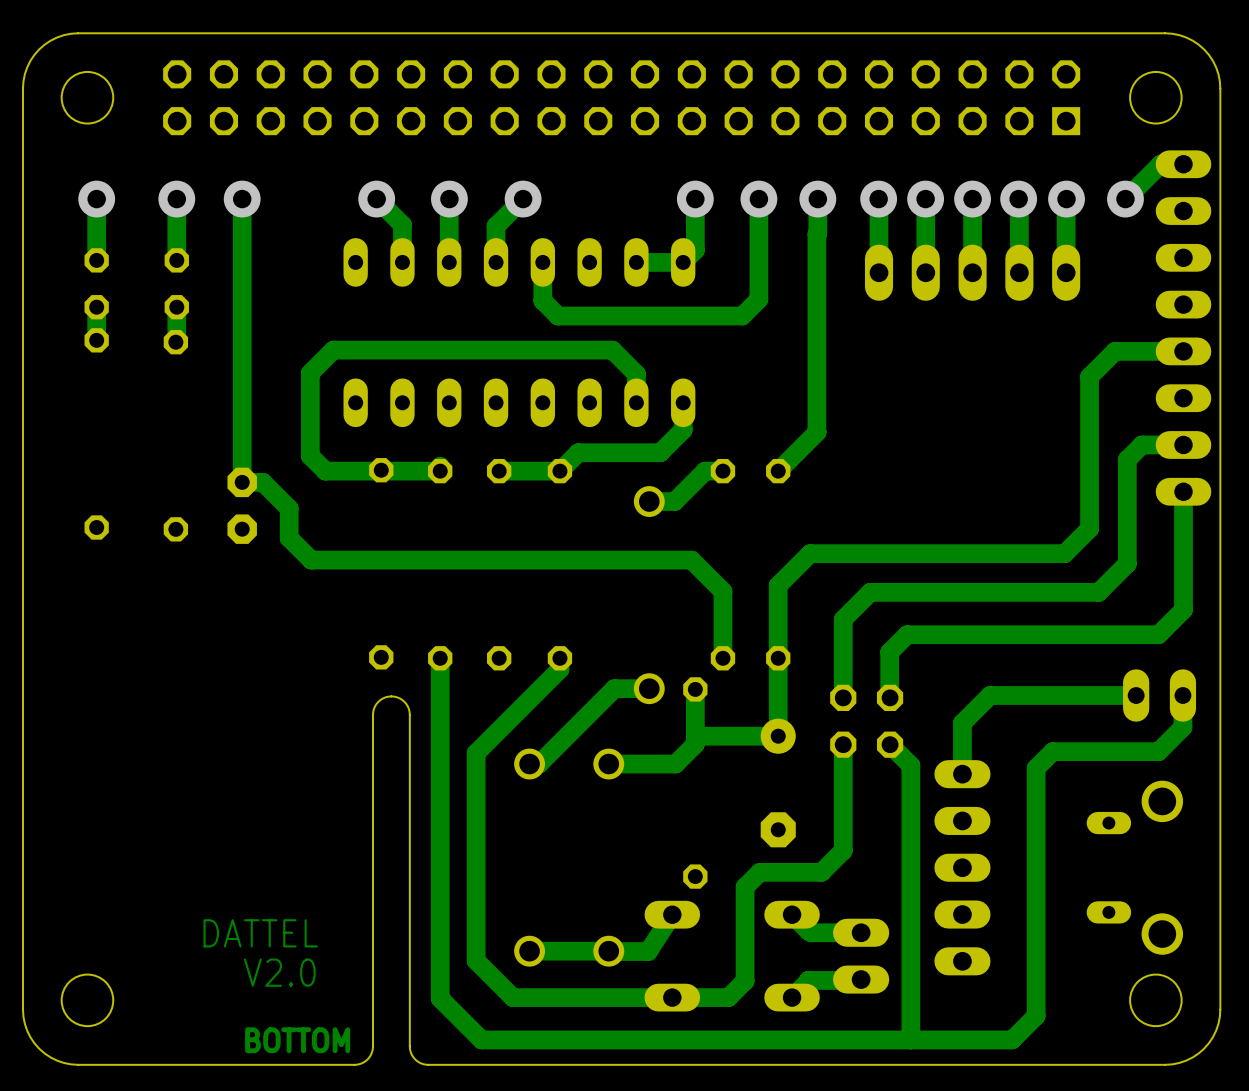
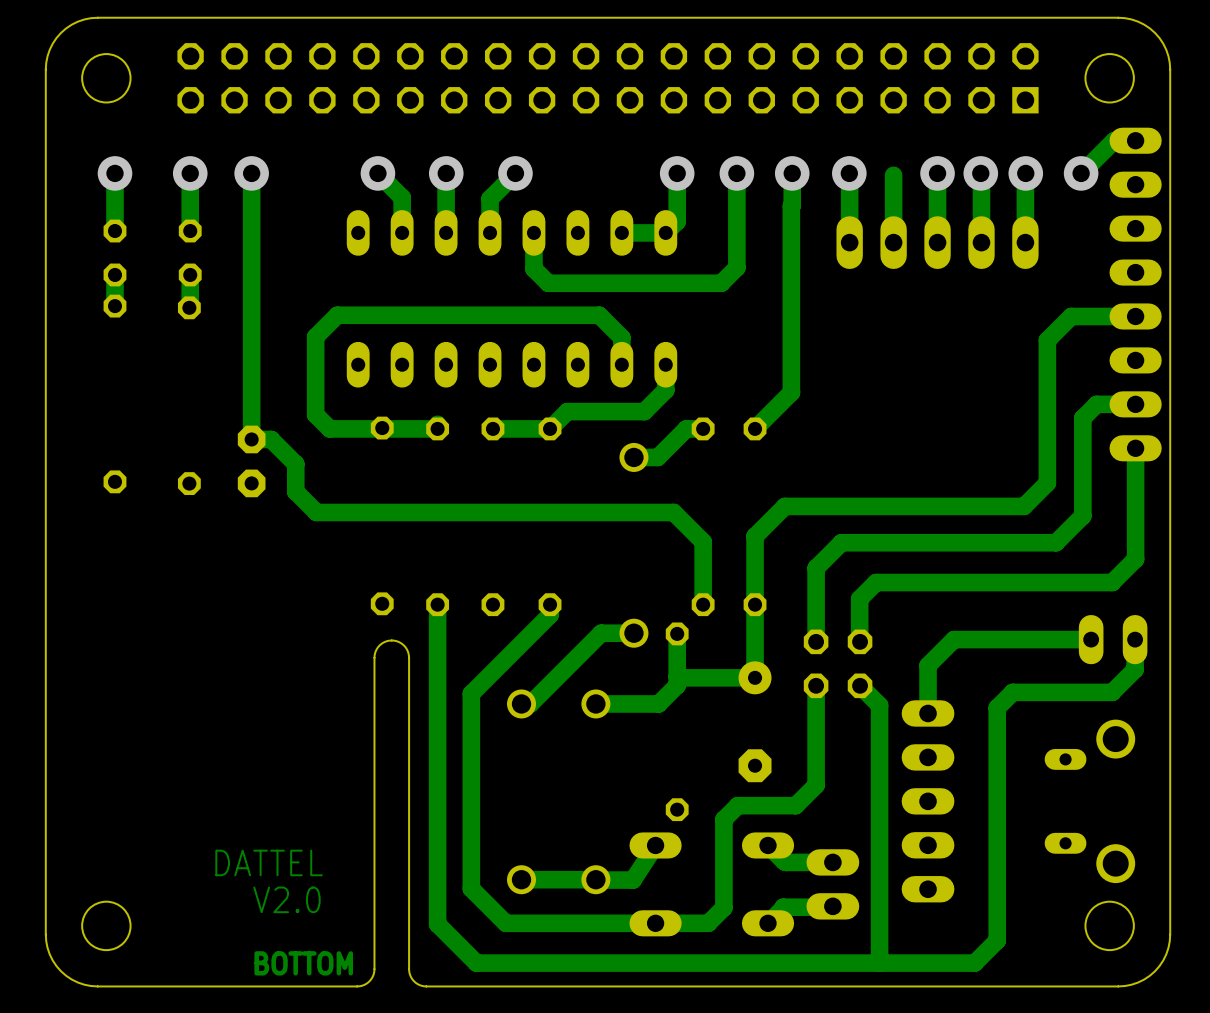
via: (925, 199) -> none

